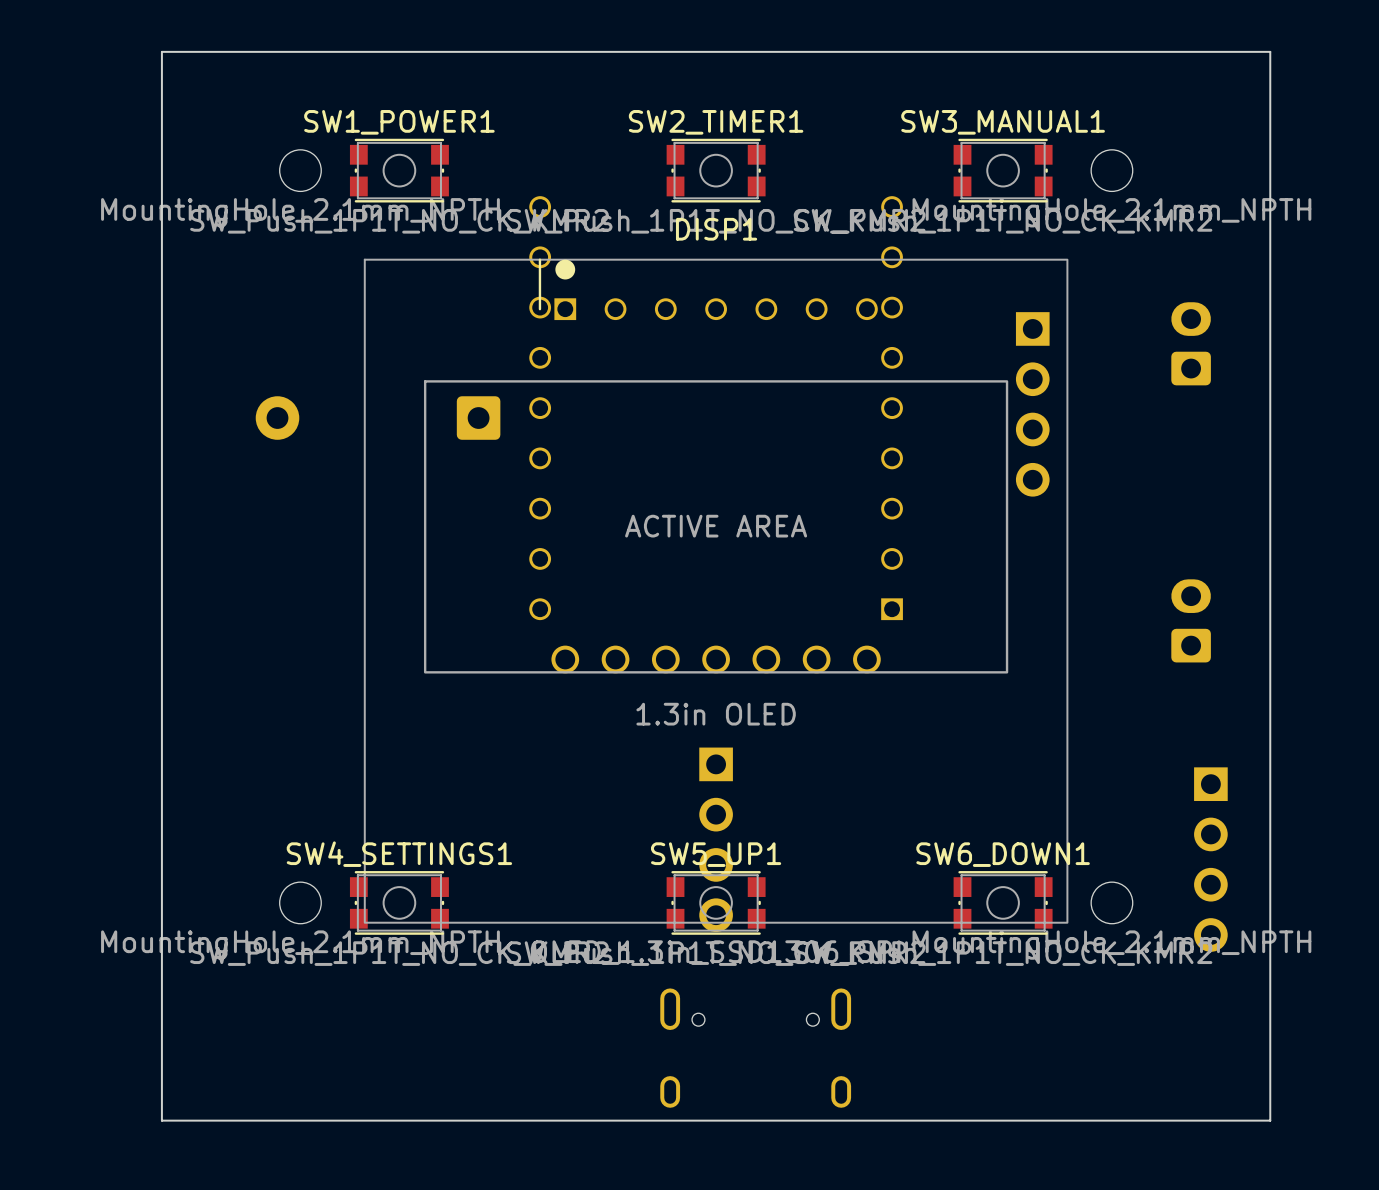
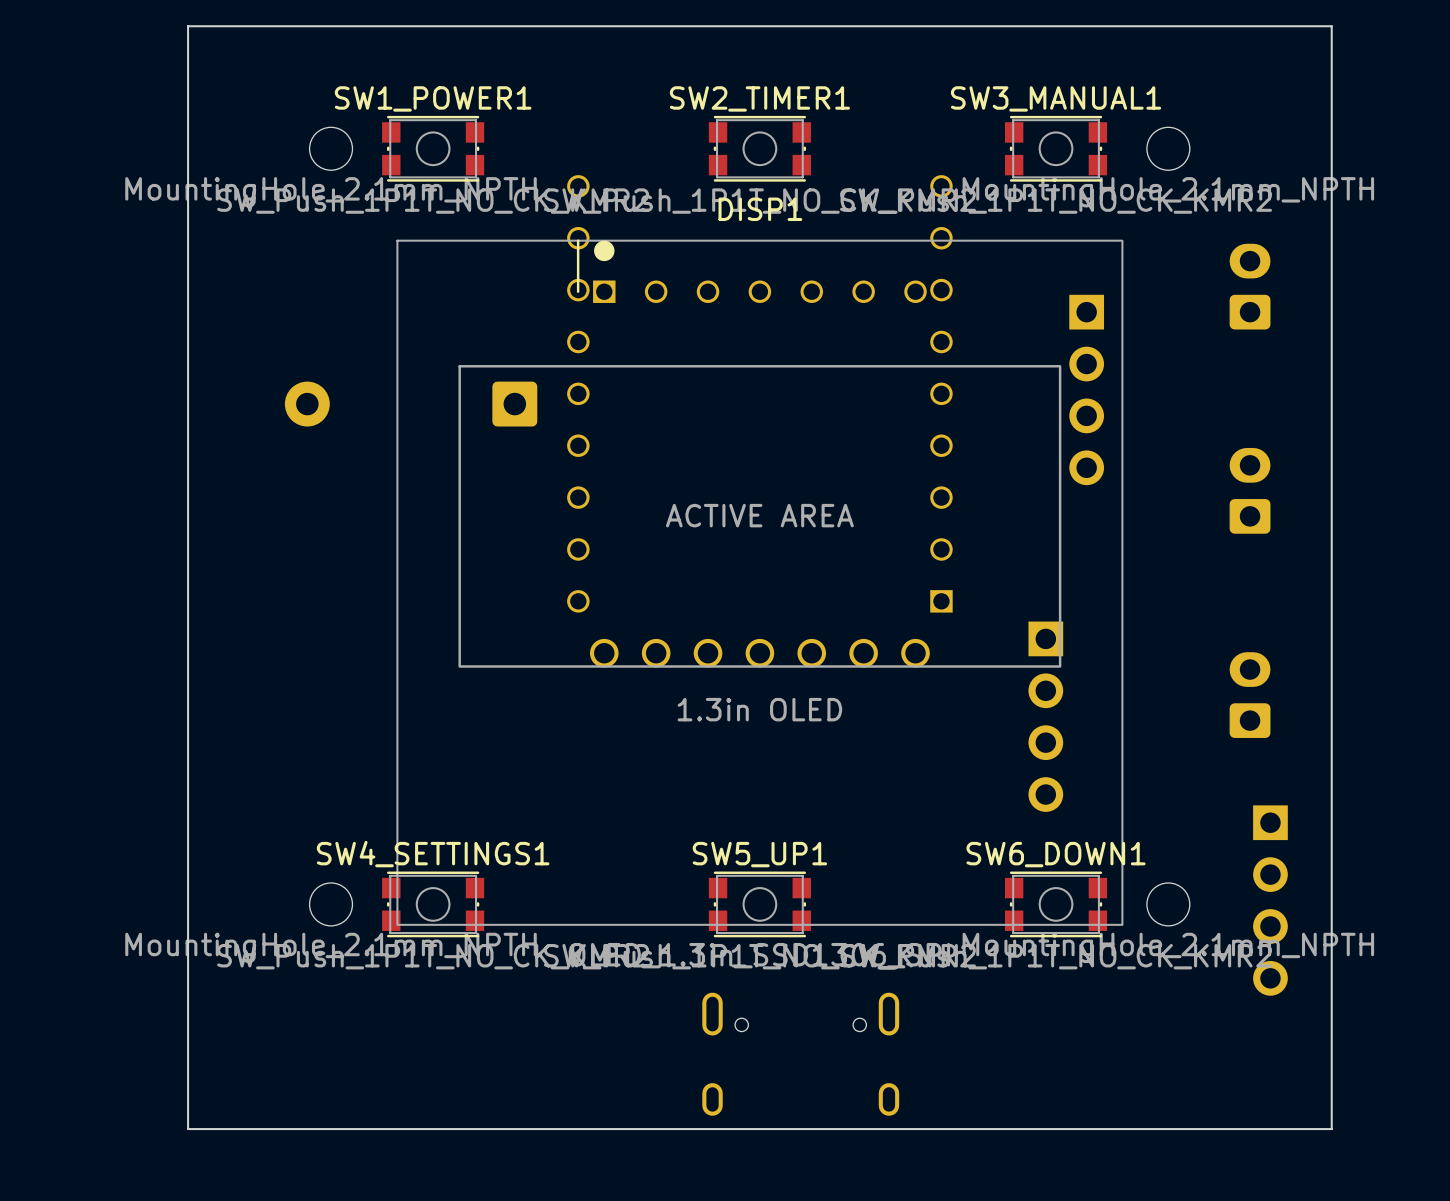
part position: (1191, 343) -> (1250, 286)
part: none -> (1250, 490)
part: (1191, 620) -> none
part: none -> (1250, 695)
part: none -> (1045, 716)
part: (716, 839) -> none
part position: (1210, 859) -> (1270, 900)

